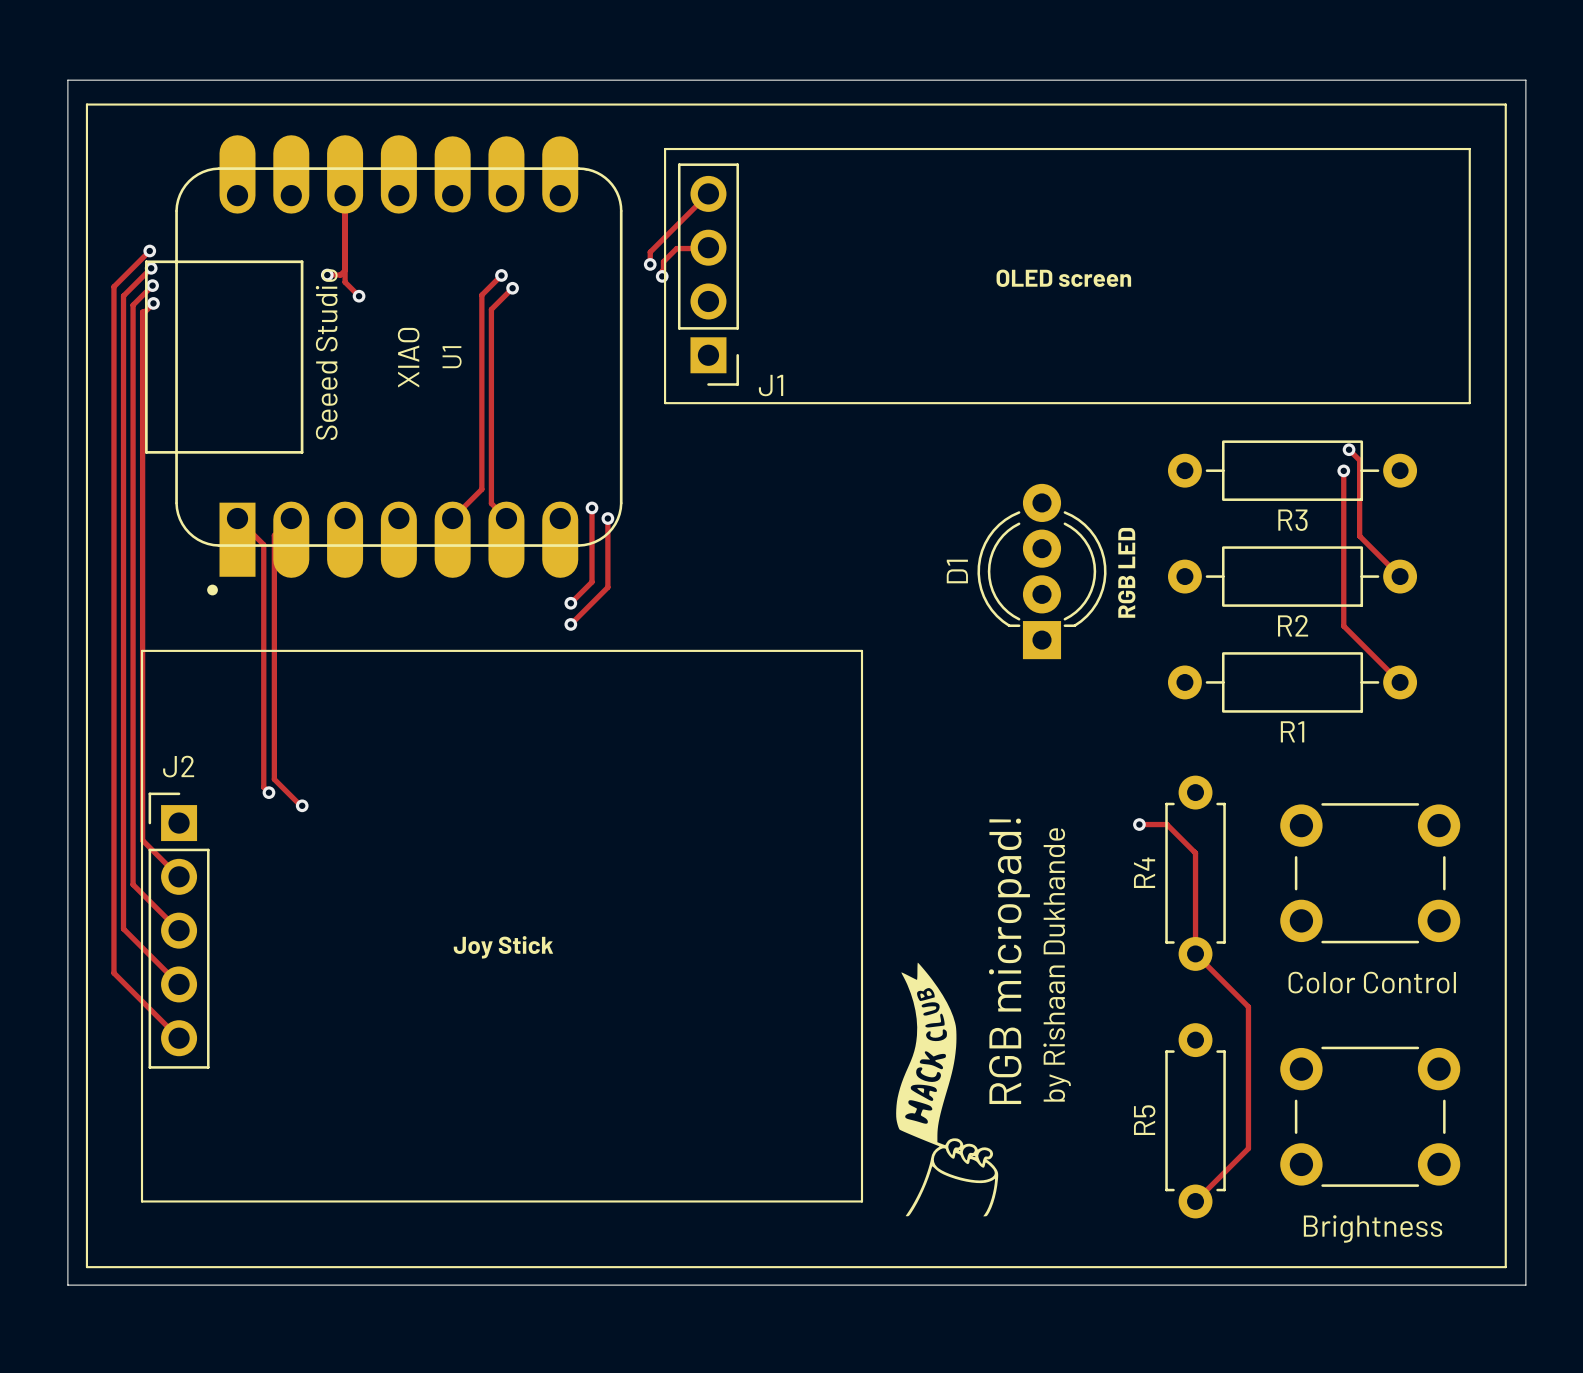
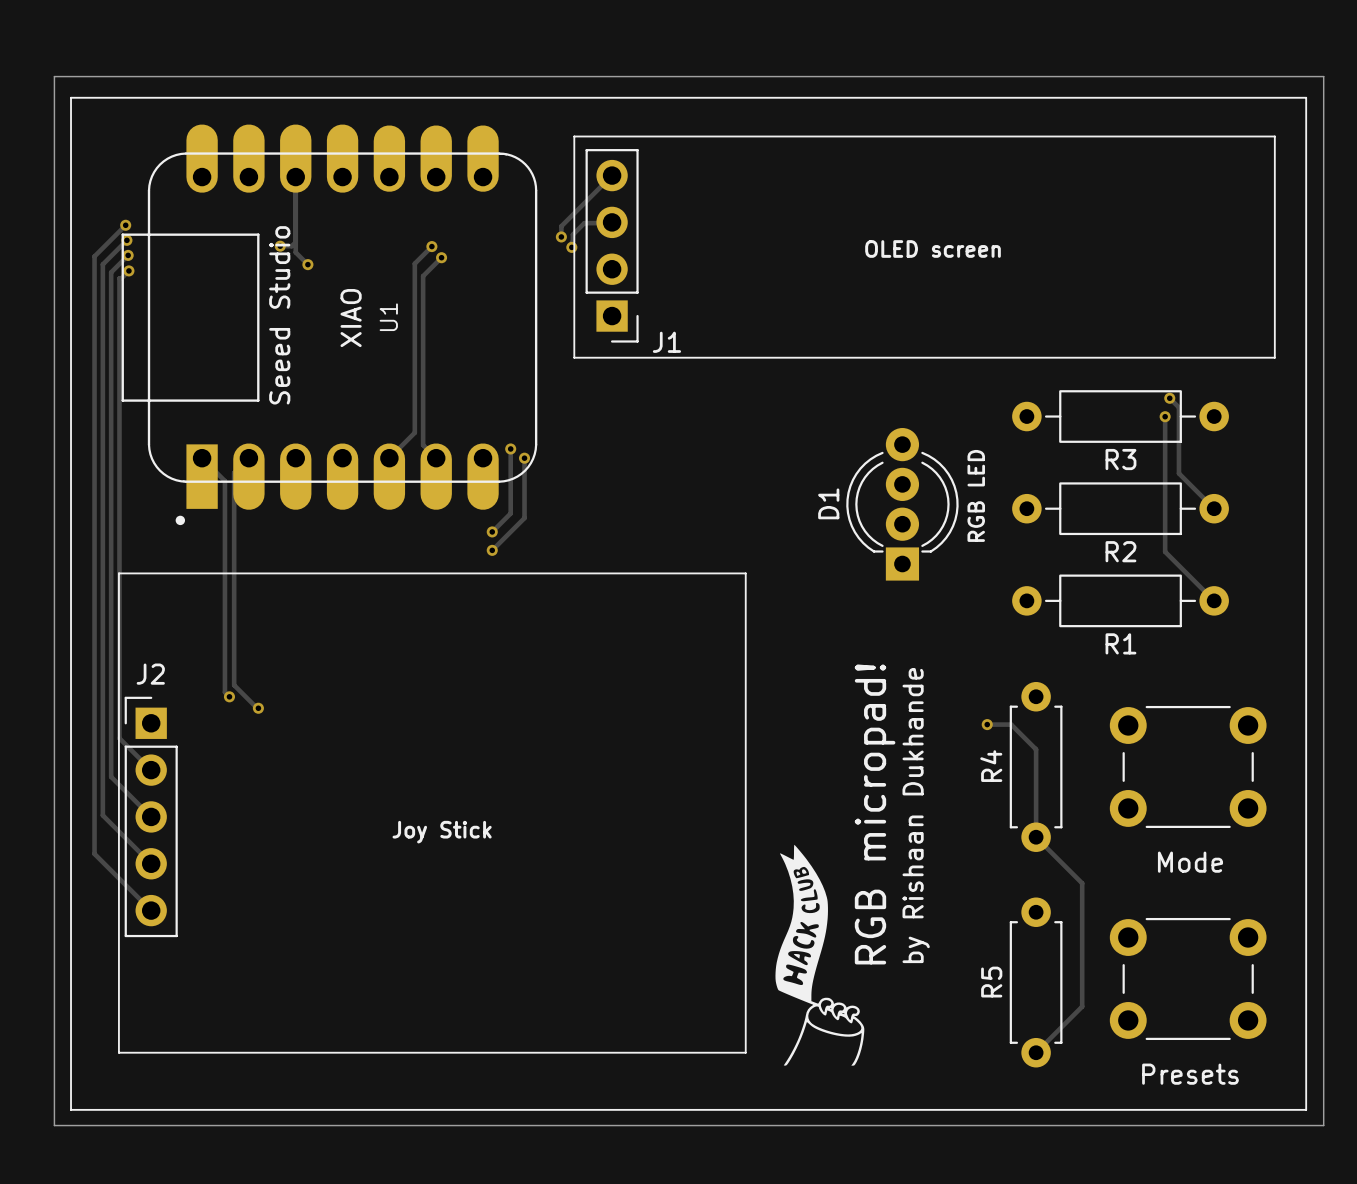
Color Control name: Color Control (1372, 982) -> Mode (1190, 862)
Brightness name: Brightness (1373, 1228) -> Presets (1190, 1074)

